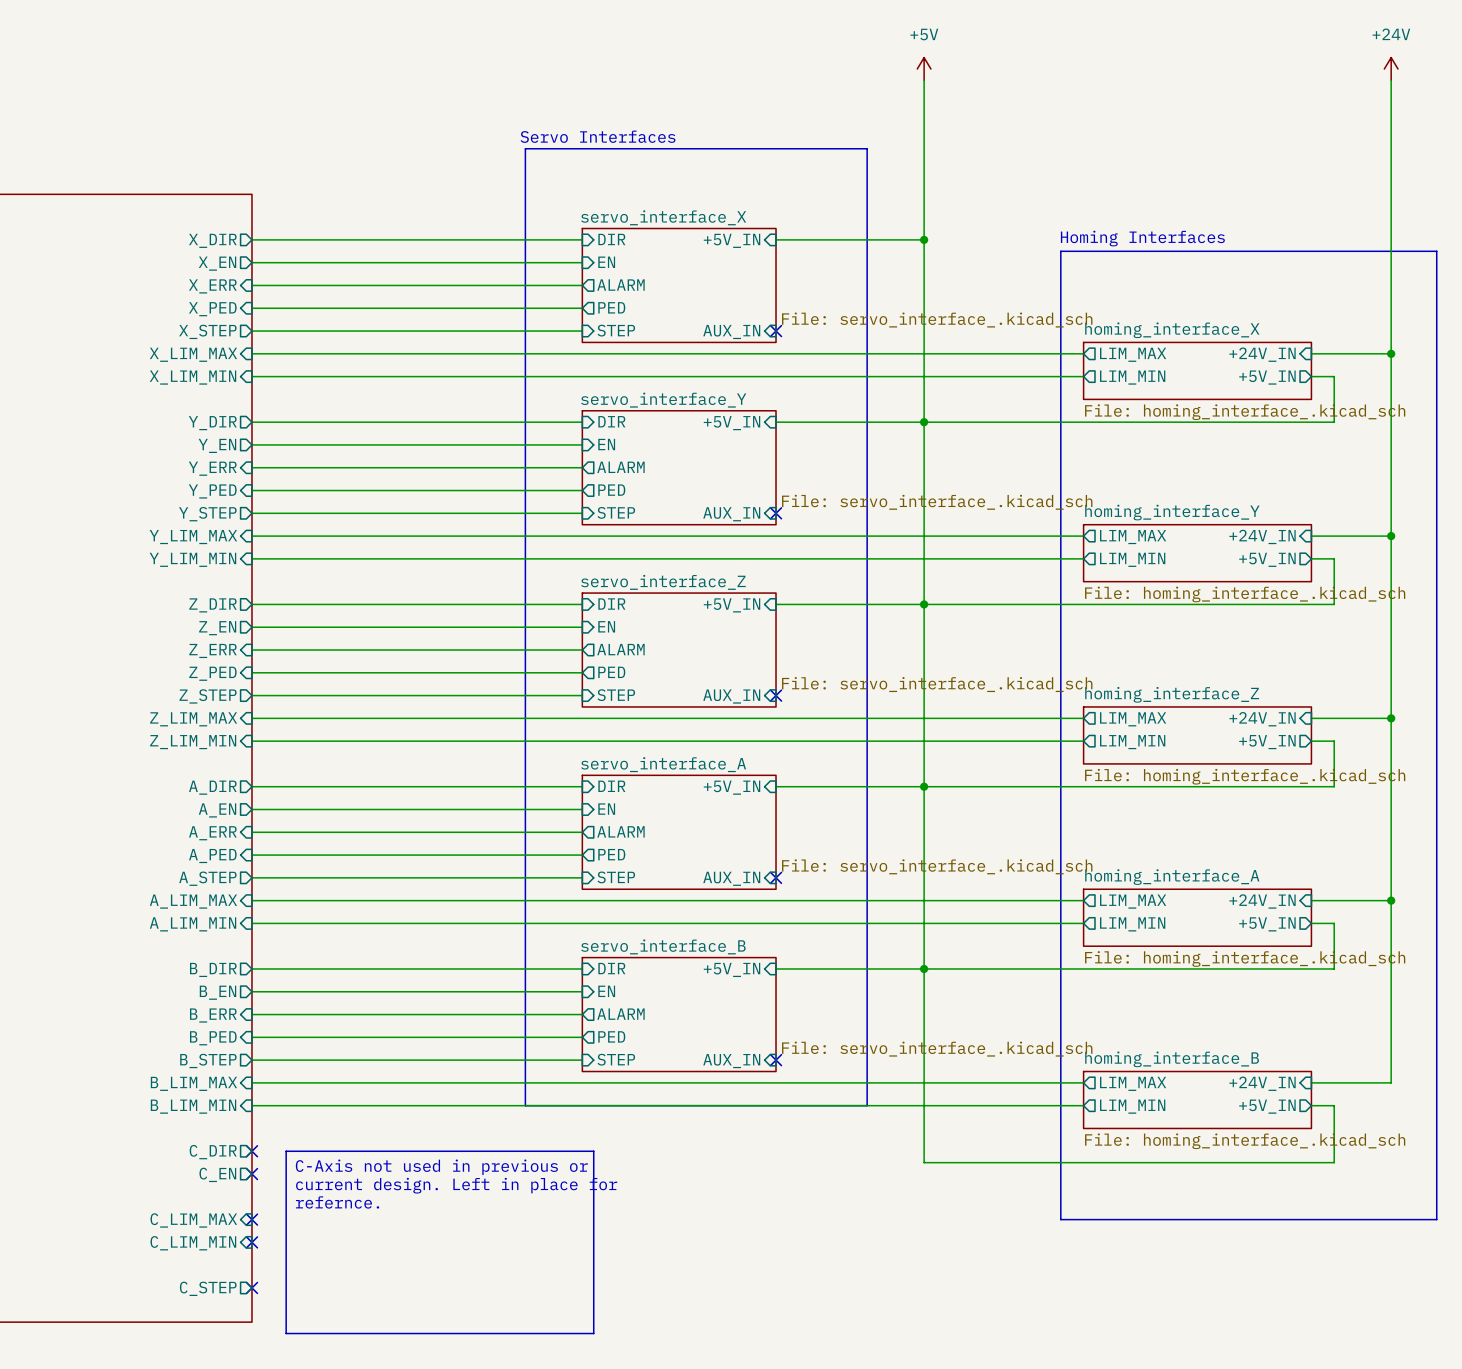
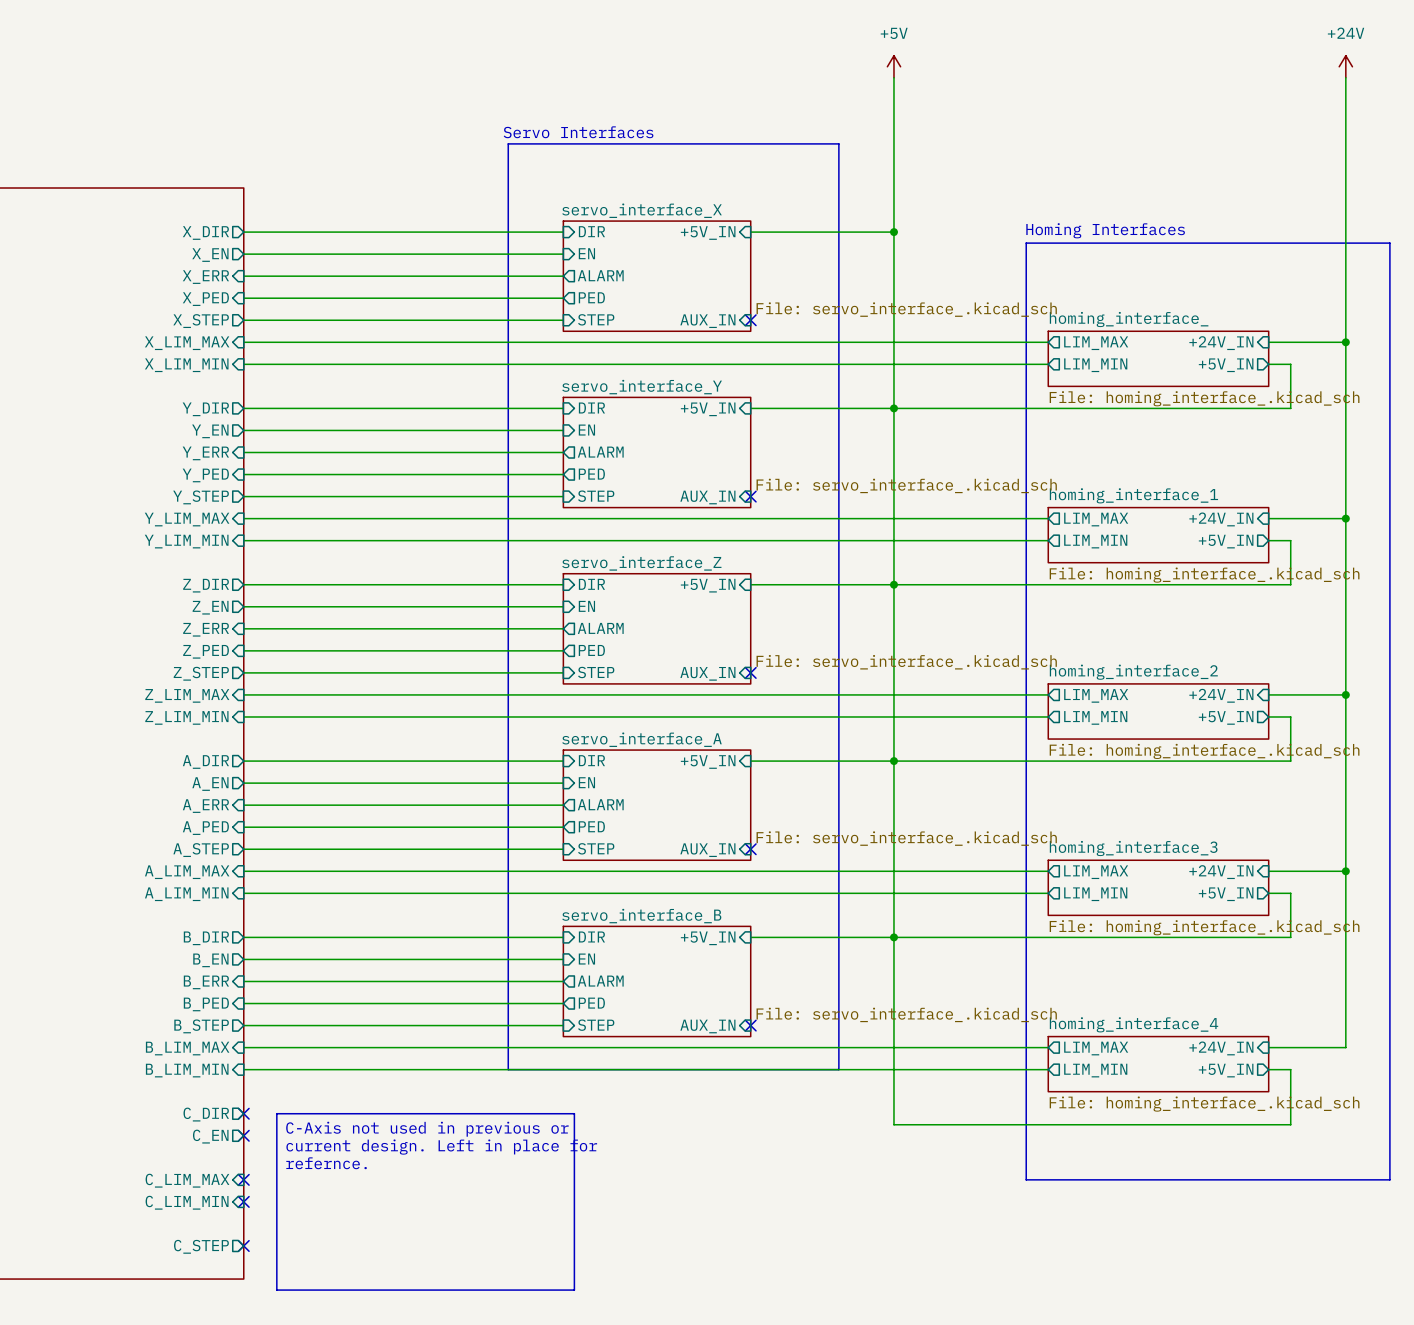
sheet homing_interface_X name: homing_interface_X (1172, 330) -> homing_interface_ (1129, 319)
sheet homing_interface_Y name: homing_interface_Y (1172, 512) -> homing_interface_1 (1133, 495)
sheet homing_interface_Z name: homing_interface_Z (1172, 694) -> homing_interface_2 (1133, 672)
sheet homing_interface_A name: homing_interface_A (1172, 877) -> homing_interface_3 (1133, 848)
sheet homing_interface_B name: homing_interface_B (1172, 1059) -> homing_interface_4 (1134, 1024)

